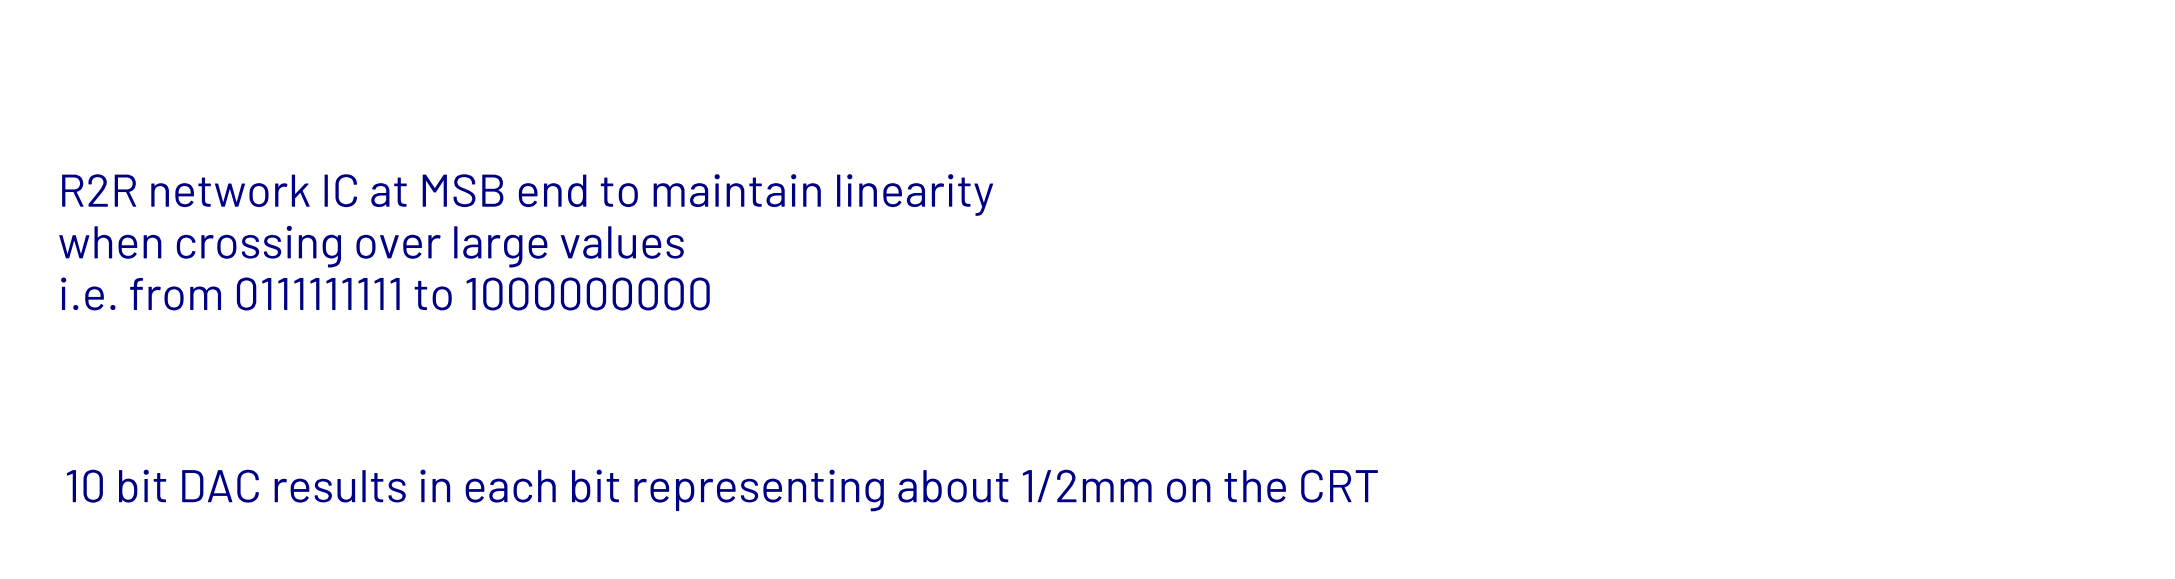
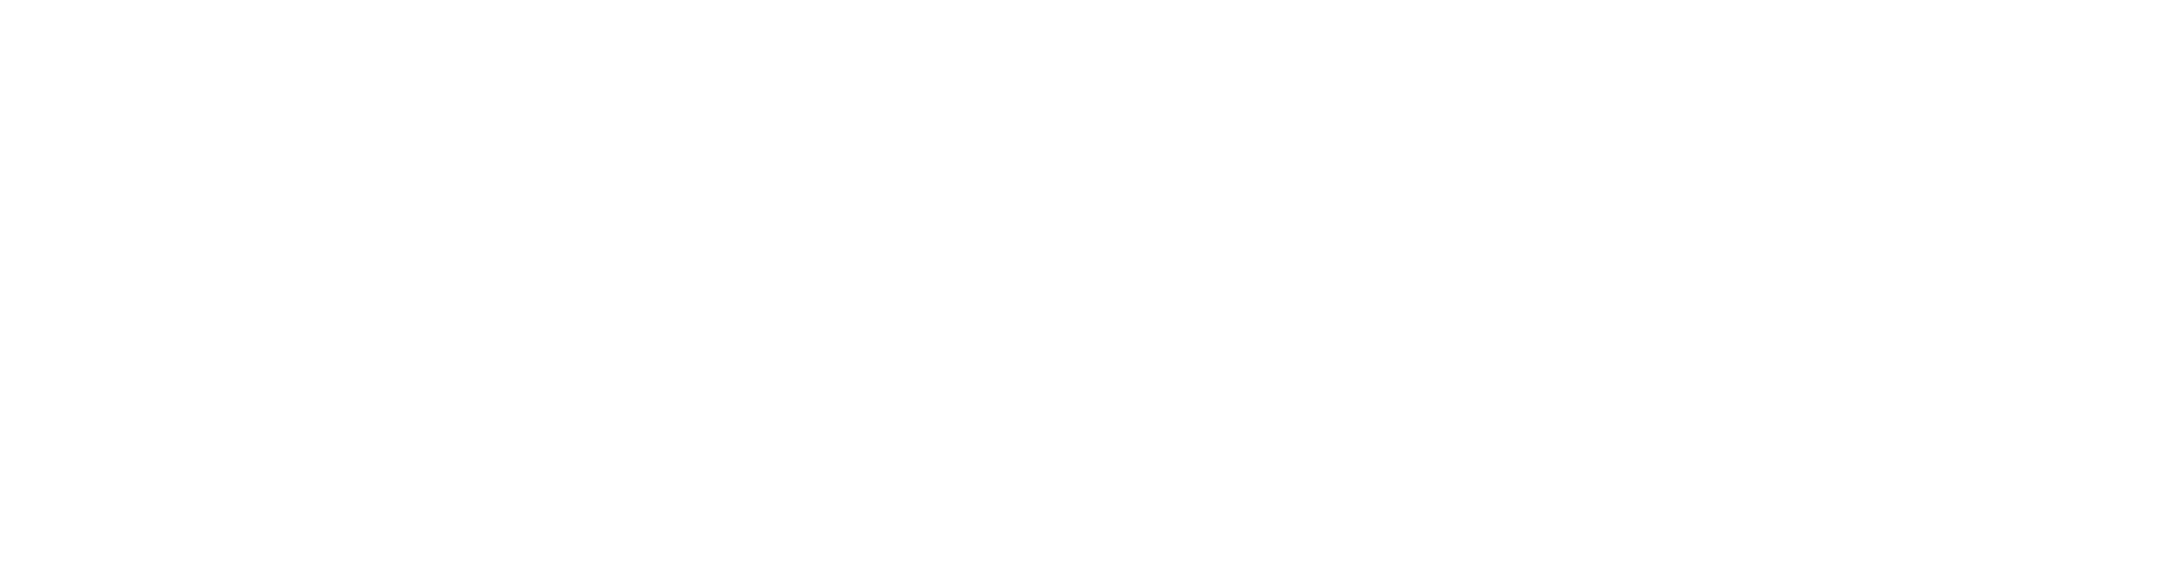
text: R2R network IC at MSB end to maintain linearity (527, 195) -> none
text: when crossing over large values (371, 246) -> none
text: i.e. from 0111111111 to 1000000000 (385, 293) -> none
text: 10 bit DAC results in each bit representing about 1/2mm on the CRT (722, 490) -> none

